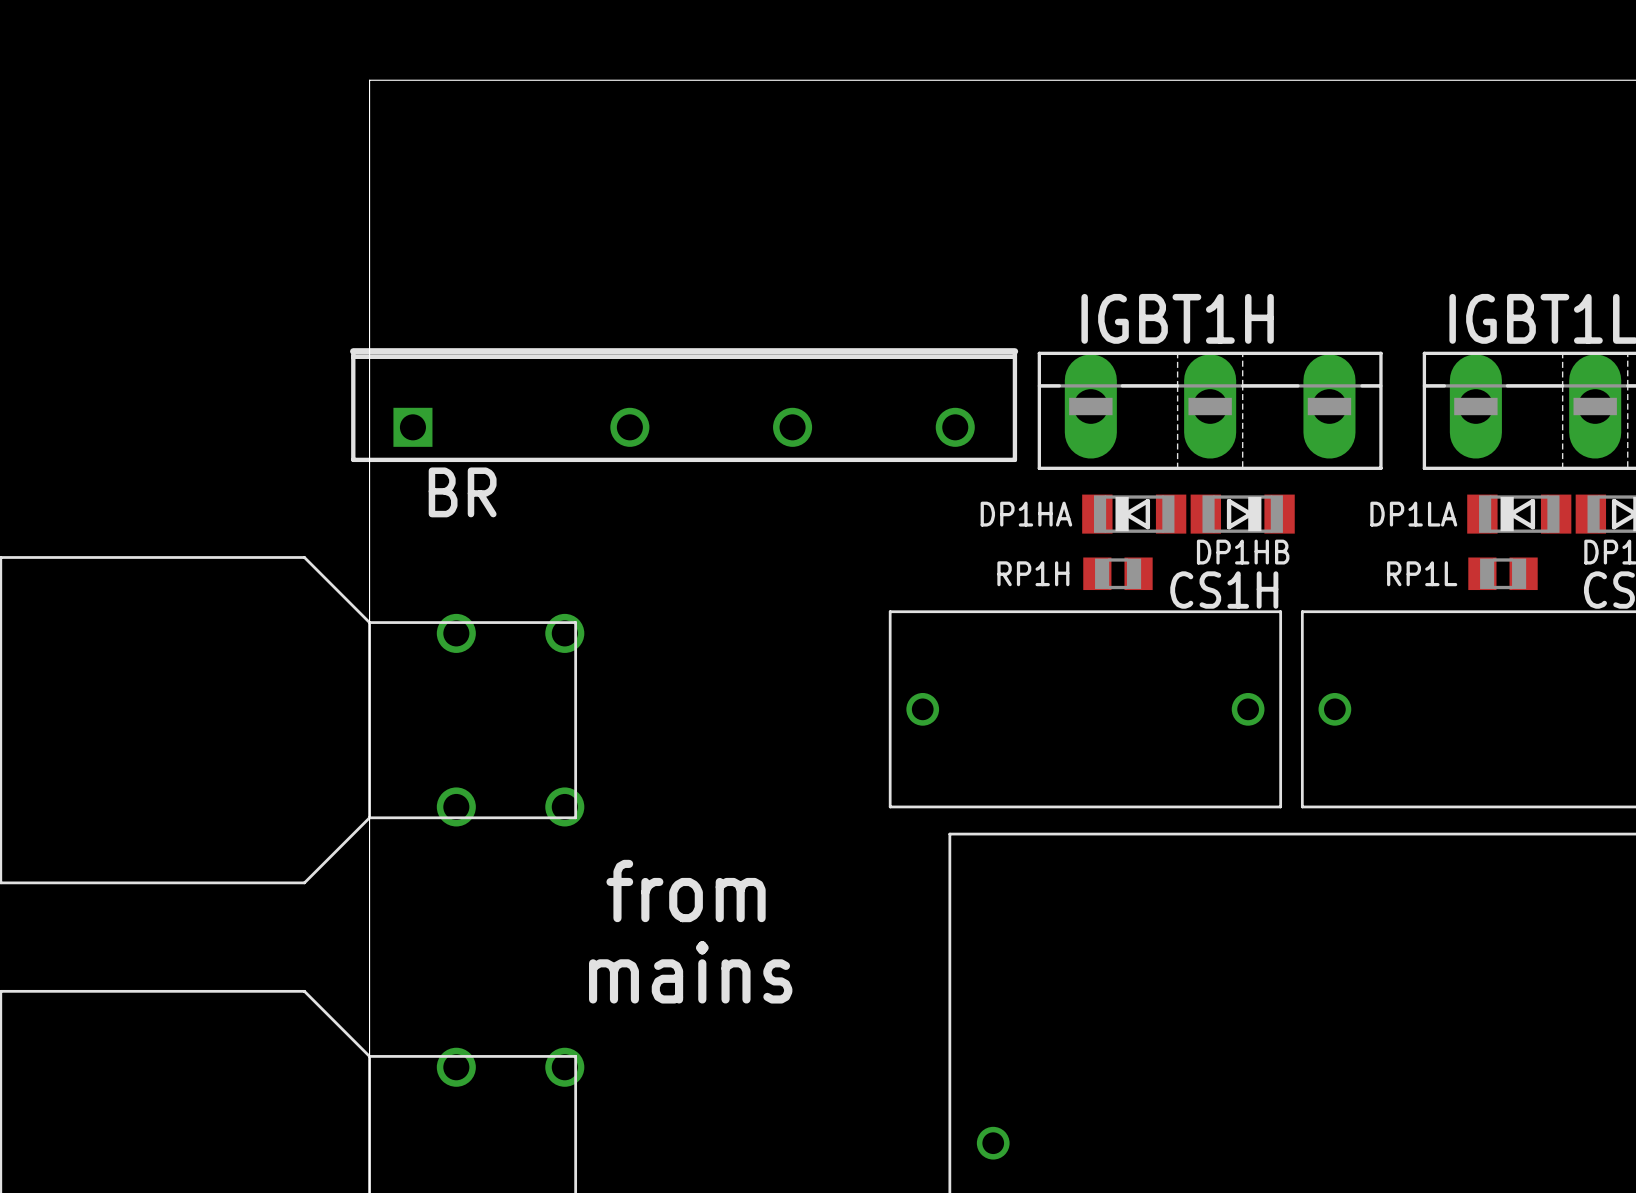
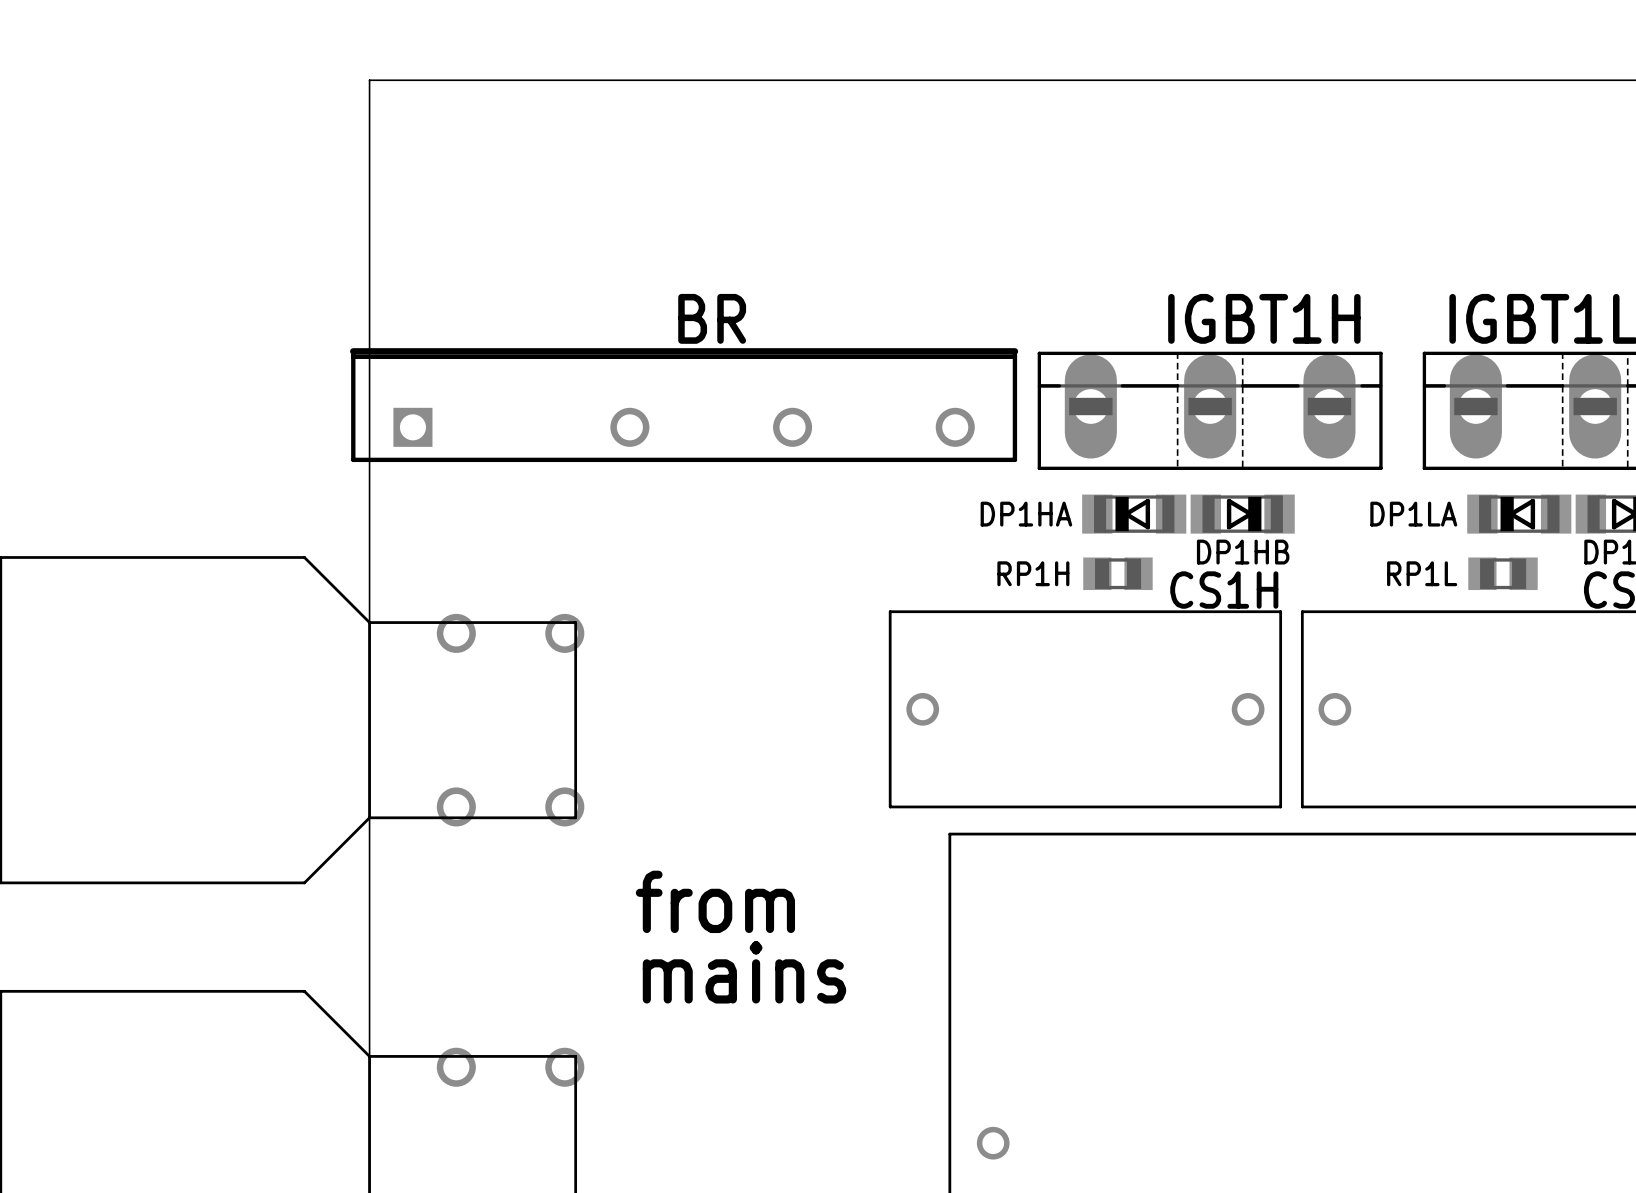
IGBT1H name position: IGBT1H (1177, 318) -> IGBT1H (1264, 318)
BR name position: BR (462, 492) -> BR (712, 318)
text position: from (686, 891) -> from (715, 901)
text position: mains (690, 972) -> mains (744, 972)

